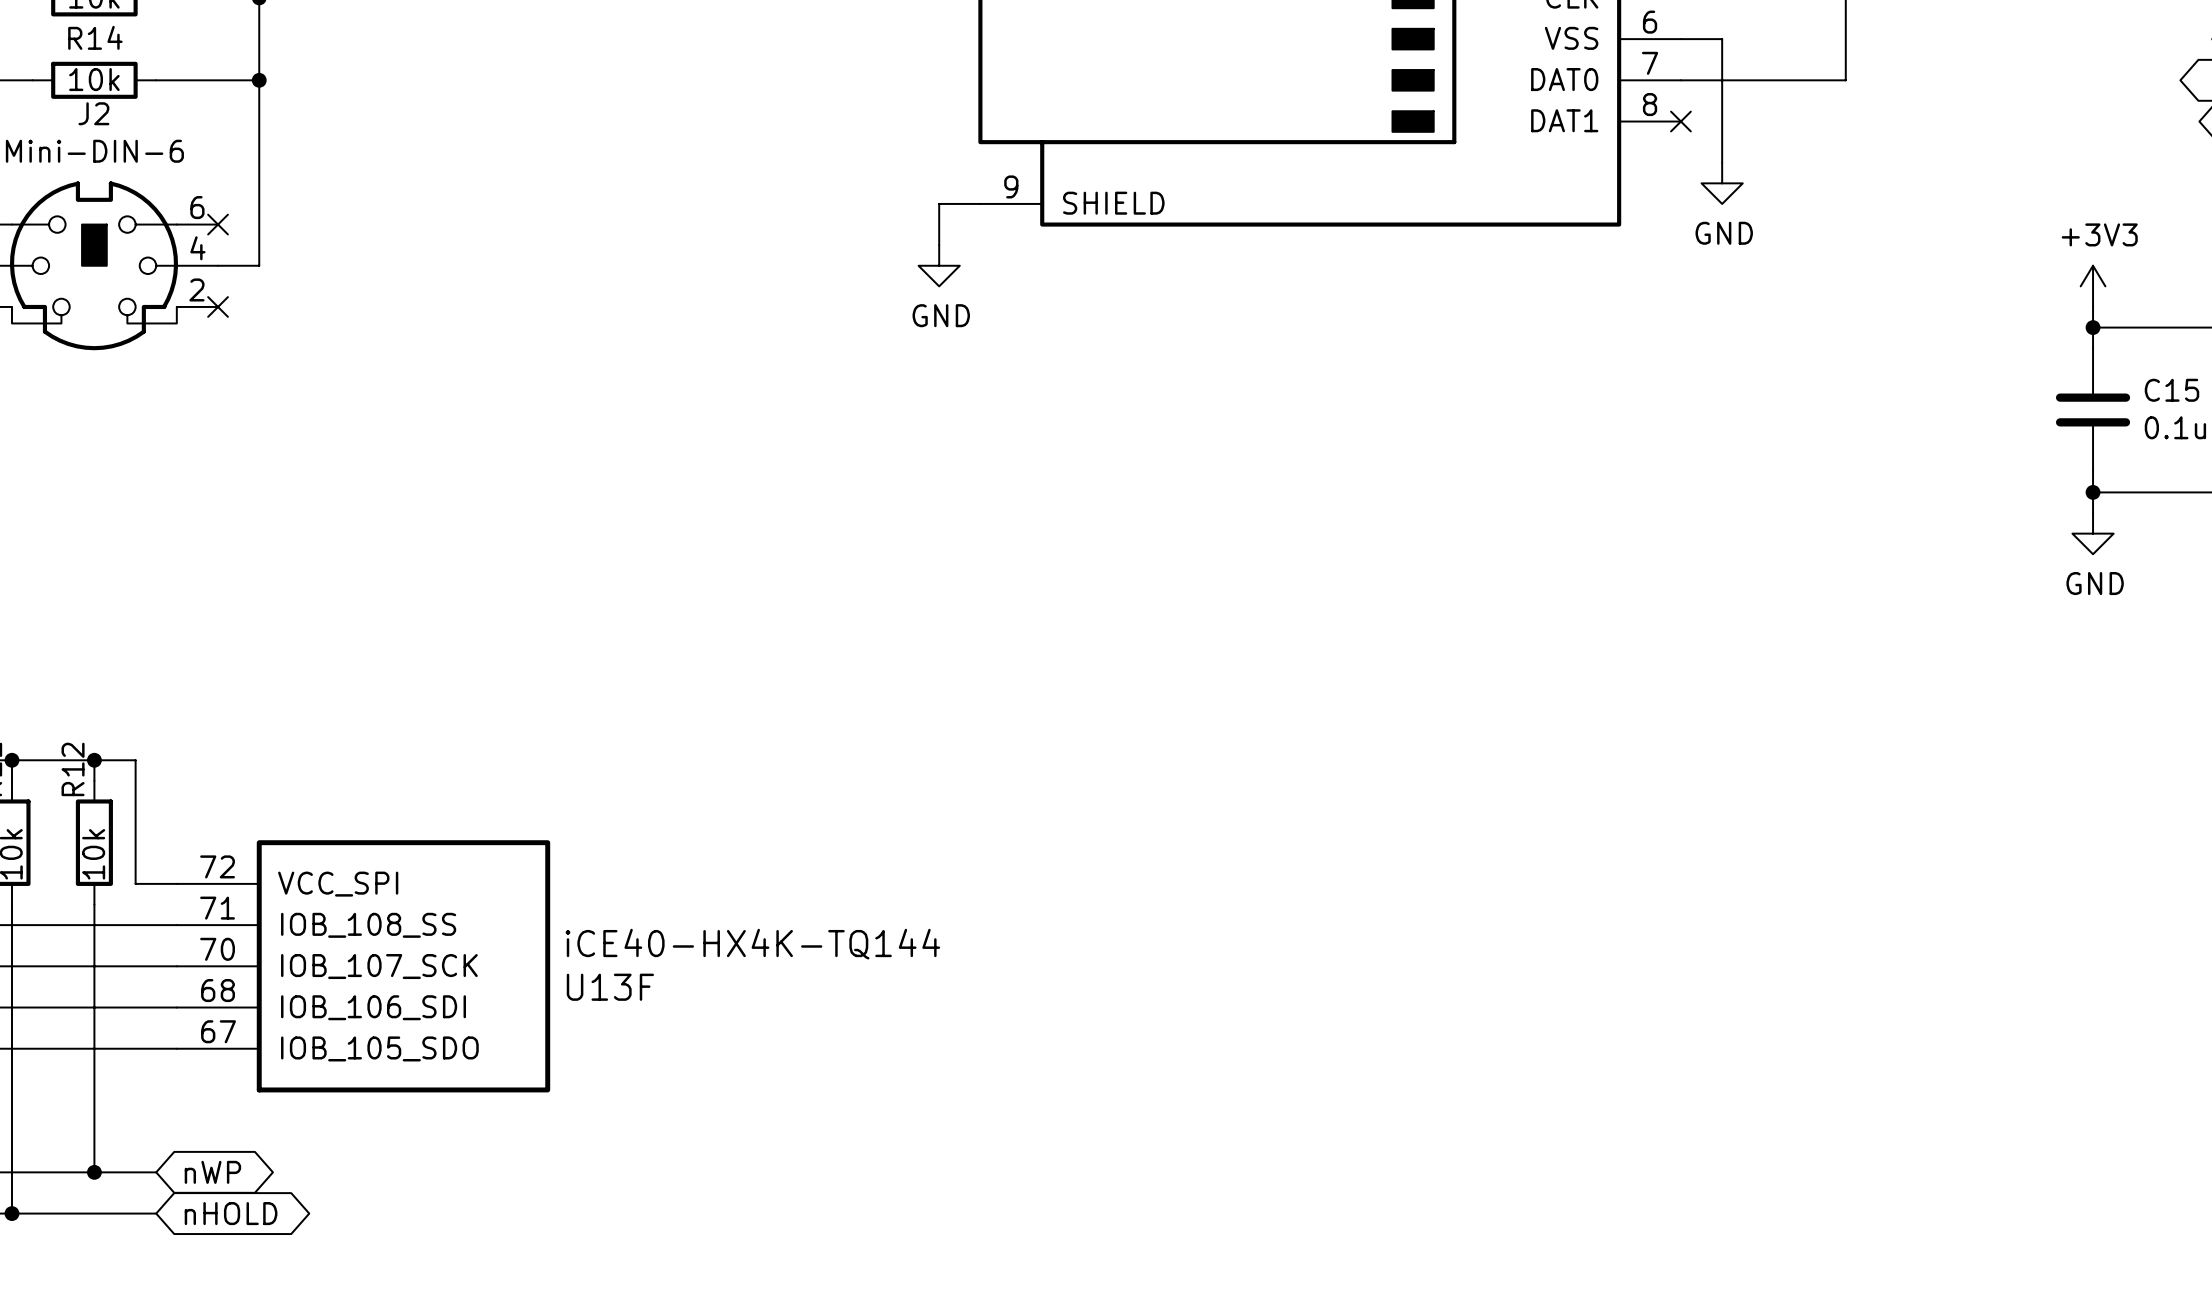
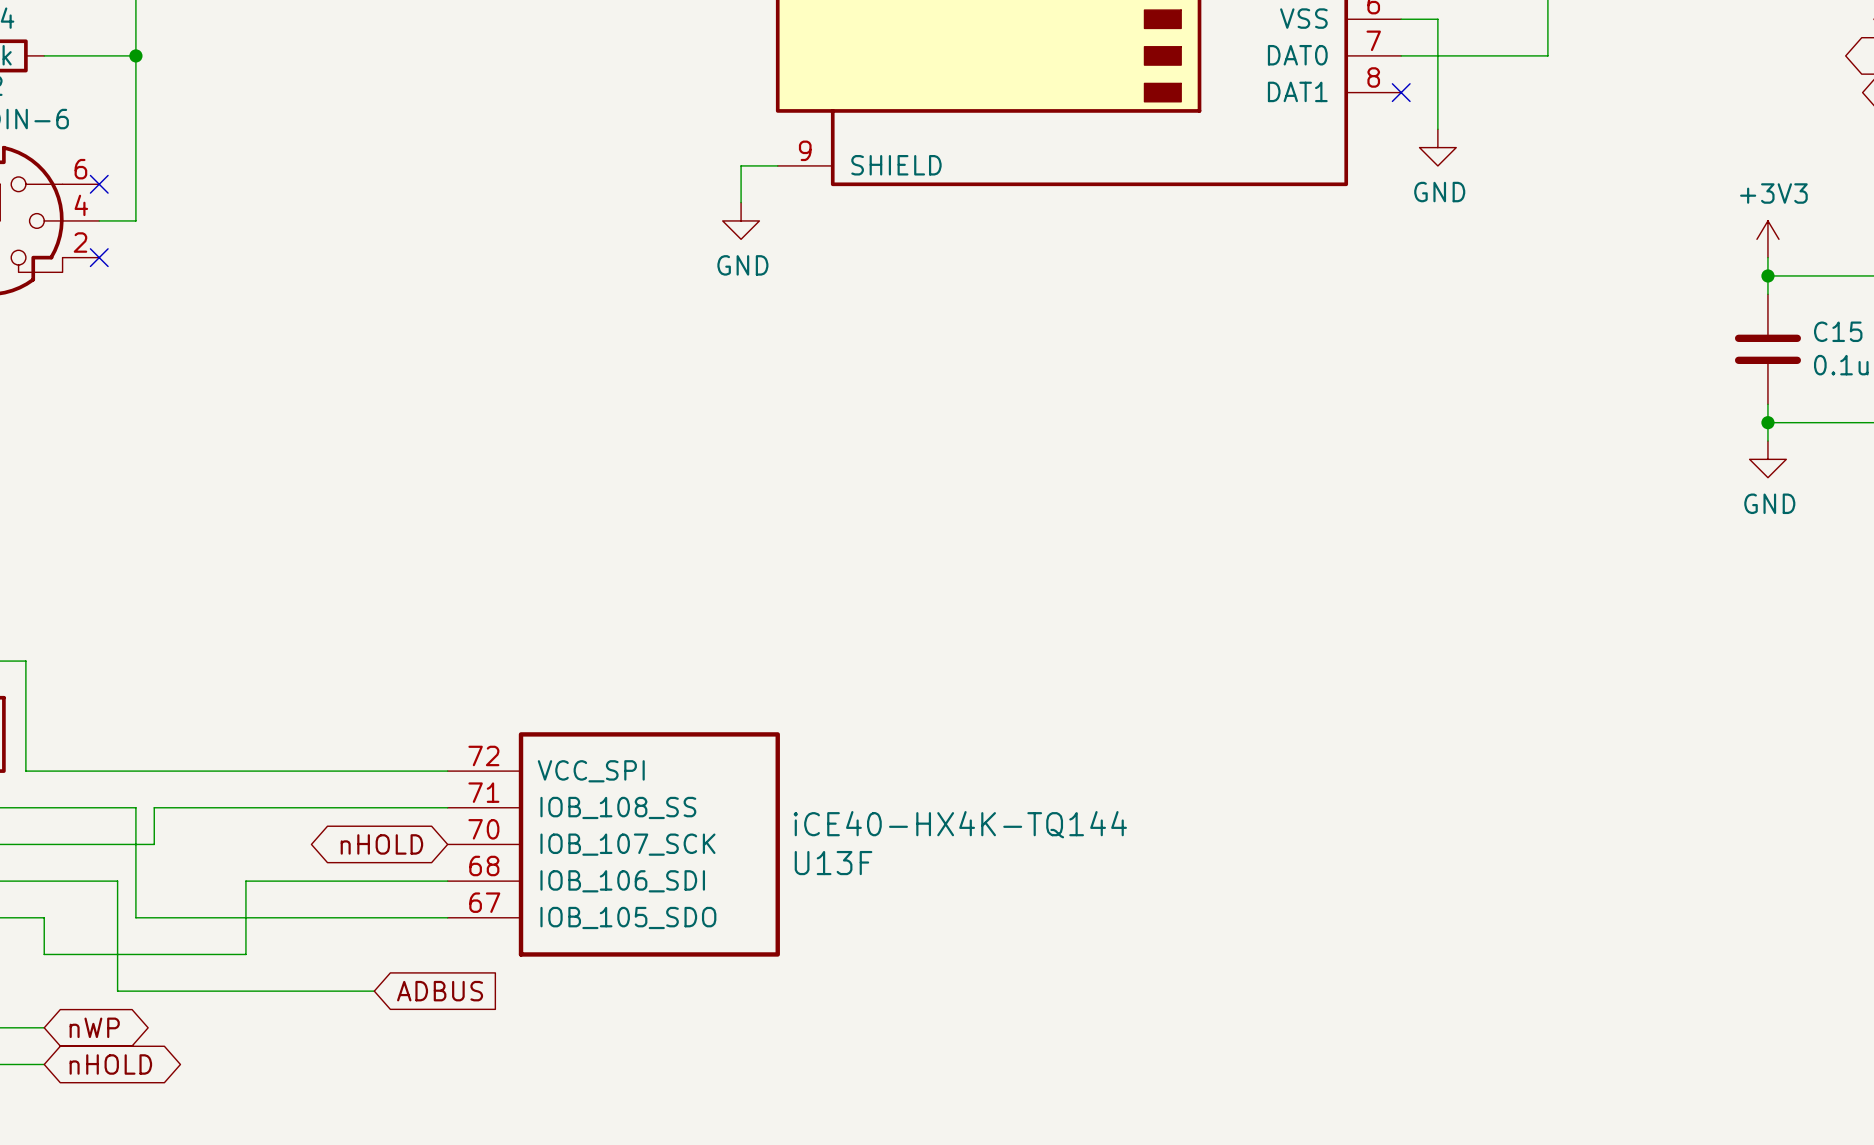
wire: none -> (62, 771) (447, 771)
wire: none -> (62, 807) (135, 807) (135, 917) (447, 917)
wire: none -> (447, 807) (154, 807) (154, 844) (62, 844)
U13F position: (363, 966) -> (613, 844)
global label: none -> nHOLD (381, 844)
wire: none -> (62, 881) (117, 881) (117, 991) (374, 991)
wire: (156, 1048) (176, 1048) -> (44, 917) (44, 954) (245, 954) (245, 881) (447, 881)
global label: none -> ADBUS (440, 991)

